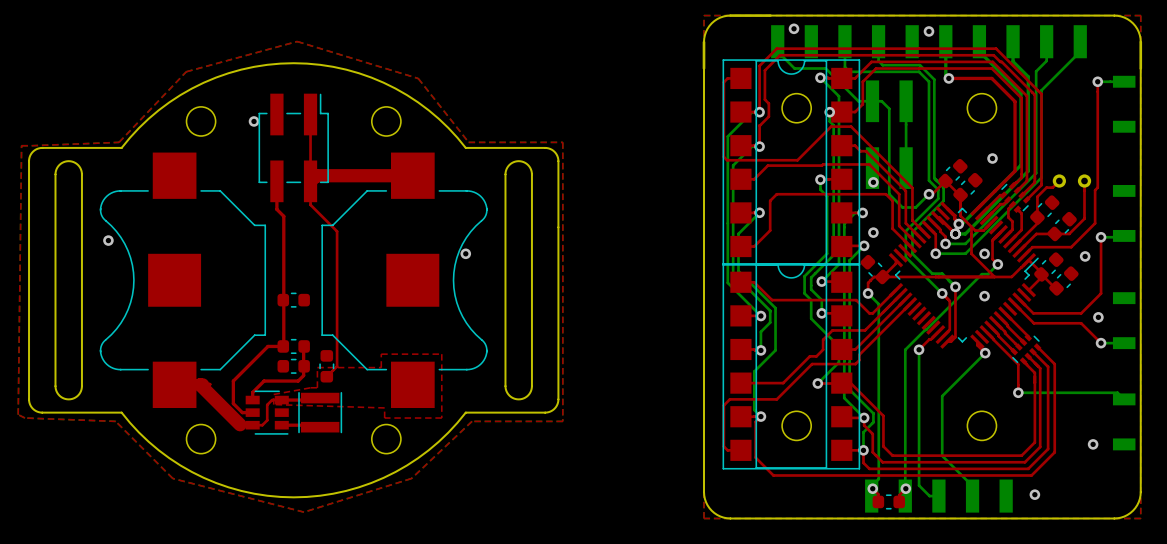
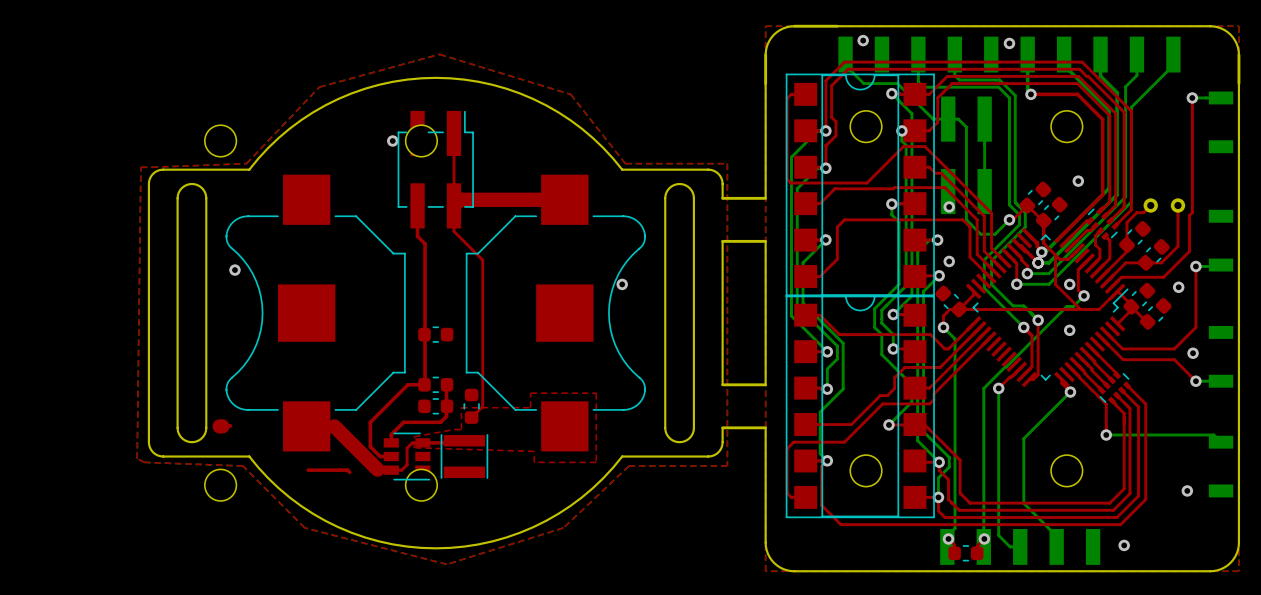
top zone outline: (297, 41) (186, 71) (119, 142) (21, 145) (18, 414) (24, 418) (115, 421) (172, 478) (303, 512) (411, 478) (472, 421) (562, 421) (562, 142) (468, 142) (418, 78) (297, 41) -> (439, 54) (319, 87) (246, 163) (140, 167) (137, 458) (144, 462) (242, 466) (304, 527) (446, 564) (563, 527) (629, 466) (727, 466) (727, 163) (625, 163) (570, 94) (439, 54)
top track: (310, 114) (310, 204) (337, 231) (337, 366) (326, 376) -> (453, 133) (453, 231) (482, 260) (482, 406) (471, 417)
via: (254, 121) -> none
via: none -> (392, 140)
board edge: (42, 147) (121, 147) (139, 127) (158, 110) (180, 95) (203, 82) (228, 73) (254, 66) (293, 63) (320, 64) (346, 69) (371, 77) (395, 88) (418, 102) (438, 118) (465, 147) (545, 147) (551, 149) (556, 154) (558, 161) (558, 399) (556, 406) (546, 412) (465, 412) (448, 432) (428, 450) (407, 465) (383, 477) (346, 490) (320, 495) (293, 497) (267, 495) (241, 490) (216, 482) (191, 472) (169, 458) (148, 441) (121, 412) (42, 412) (35, 410) (30, 406) (29, 399) (29, 161) (32, 151) (42, 147) -> none
part position: (293, 147) -> (435, 169)
board edge: (55, 174) (55, 386) (59, 395) (68, 399) (78, 395) (81, 386) (81, 174) (78, 165) (68, 161) (59, 165) (55, 174) -> (177, 198) (177, 427) (181, 437) (191, 442) (202, 437) (206, 427) (206, 198) (202, 188) (191, 184) (181, 188) (177, 198)
board edge: (505, 174) (505, 386) (509, 395) (518, 399) (528, 395) (531, 386) (531, 174) (528, 165) (518, 161) (509, 165) (505, 174) -> (665, 198) (665, 427) (669, 437) (679, 442) (689, 437) (693, 427) (693, 198) (689, 188) (679, 184) (669, 188) (665, 198)
board edge: (704, 174) (704, 214) -> (765, 198) (722, 198) (721, 178) (711, 170) (622, 169) (603, 148) (582, 128) (558, 112) (533, 98) (506, 88) (478, 81) (435, 77) (407, 79) (378, 84) (351, 93) (325, 105) (300, 120) (278, 138) (249, 169) (161, 169) (153, 173) (148, 184) (148, 442) (150, 449) (161, 456) (249, 456) (278, 488) (300, 505) (325, 520) (351, 532) (378, 541) (421, 547) (464, 546) (492, 541) (533, 527) (570, 505) (603, 478) (622, 456) (711, 456) (721, 447) (722, 427) (765, 427)
top track: (412, 175) (316, 175) (310, 181) -> (564, 199) (460, 199) (453, 205)
top track: (276, 181) (276, 209) (283, 216) (283, 346) (267, 346) (233, 381) (233, 403) (242, 412) (252, 412) -> (417, 205) (417, 236) (425, 243) (425, 384) (407, 384) (370, 422) (370, 446) (380, 456) (391, 456)
via: (108, 240) -> none
via: none -> (234, 270)
via: (465, 253) -> none
via: none -> (622, 284)
part: (182, 280) -> none
part: none -> (315, 313)
part: (404, 280) -> none
part: none -> (555, 313)
part: (293, 300) -> none
part: none -> (435, 334)
part: (293, 346) -> none
top track: (303, 346) (303, 375) (298, 381) (264, 381) (252, 392) (252, 400) -> (446, 384) (446, 416) (440, 422) (403, 422) (391, 434) (391, 442)
part: none -> (435, 384)
board edge: (704, 346) (704, 386) -> (765, 384) (722, 384) (722, 241) (765, 241)
top zone outline: (381, 354) (381, 367) (317, 367) (317, 387) (273, 394) (273, 404) (384, 407) (384, 418) (441, 418) (441, 354) (381, 354) -> (530, 393) (530, 407) (461, 407) (461, 429) (414, 436) (414, 447) (534, 451) (534, 462) (596, 462) (596, 393) (530, 393)
part: (293, 366) -> none
part: (326, 366) -> none
part: none -> (435, 406)
part: none -> (471, 406)
top track: (174, 384) (200, 384) (242, 425) (262, 425) (267, 420) (267, 404) (272, 400) (334, 398) -> (306, 426) (334, 426) (380, 470) (401, 470) (407, 464) (407, 448) (412, 442) (462, 442) (464, 440) (479, 440)
part position: (267, 412) -> (407, 456)
part position: (320, 412) -> (464, 456)

